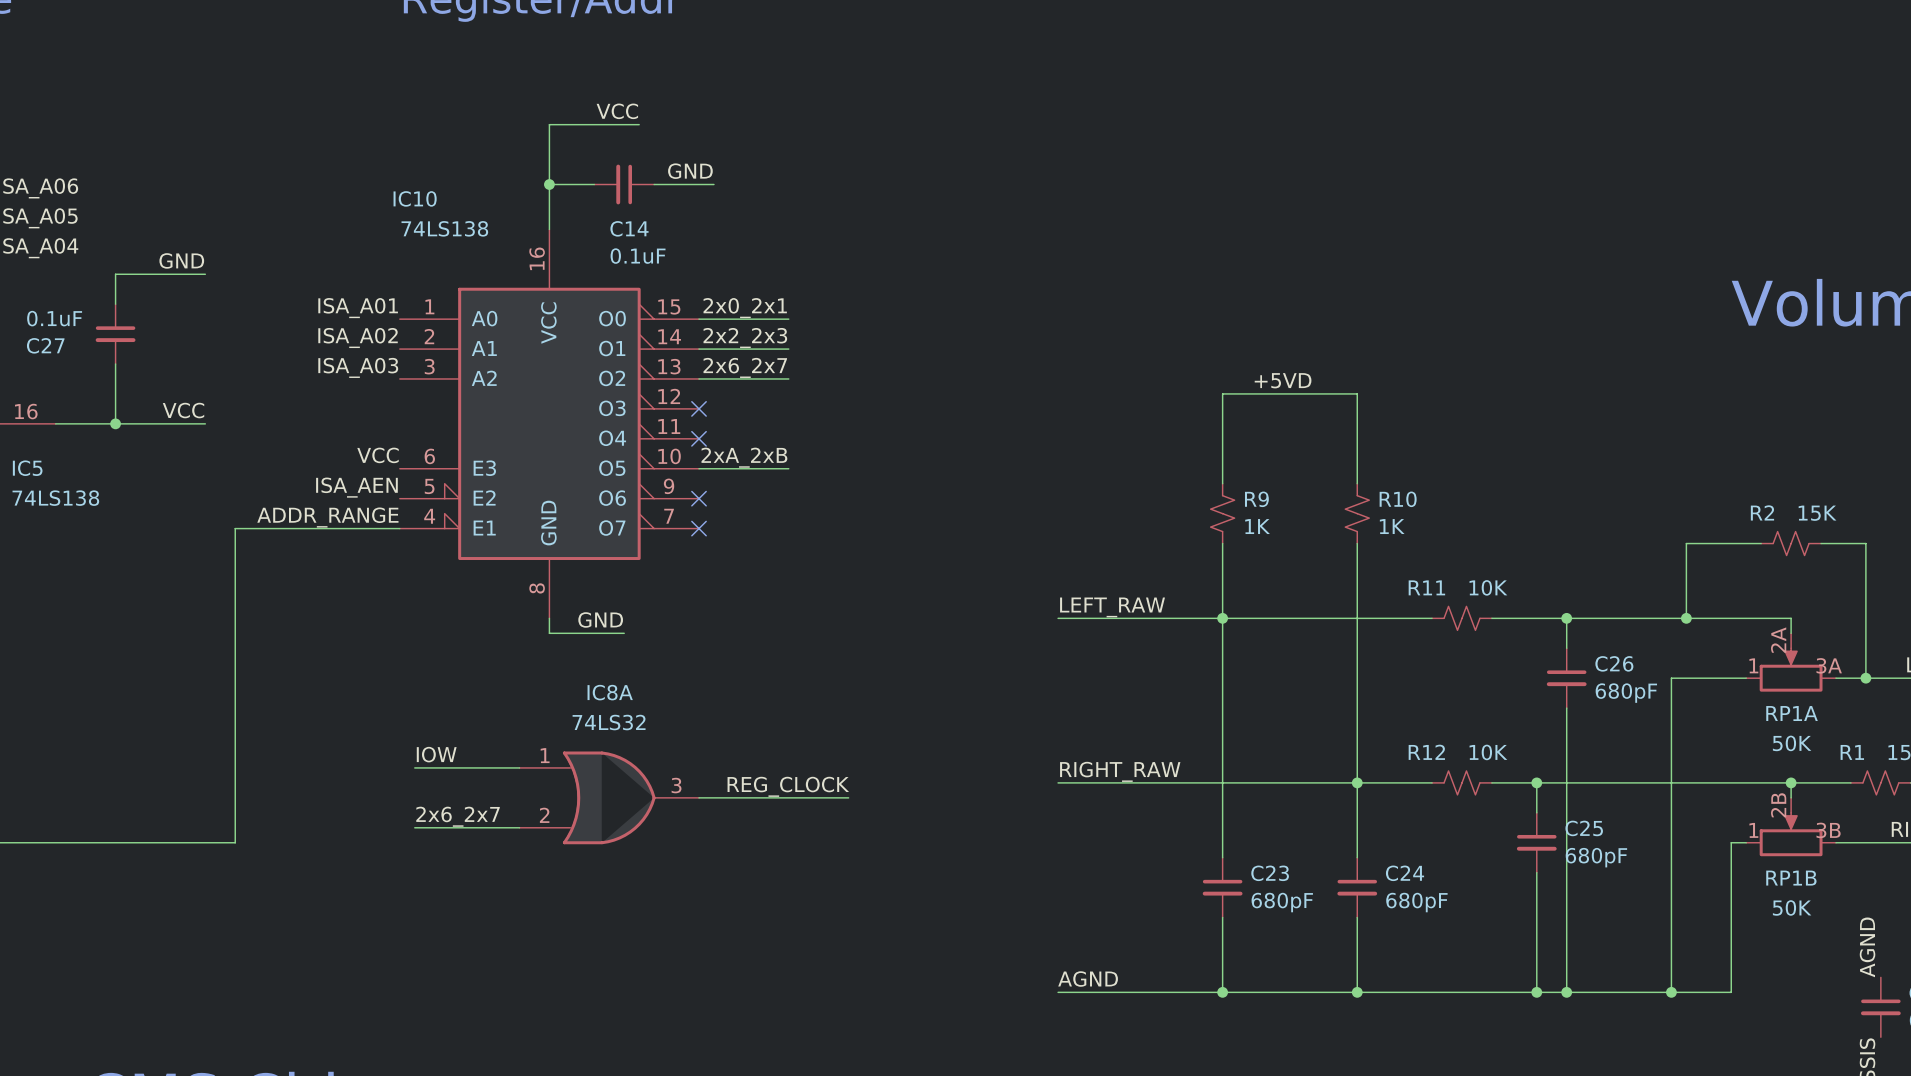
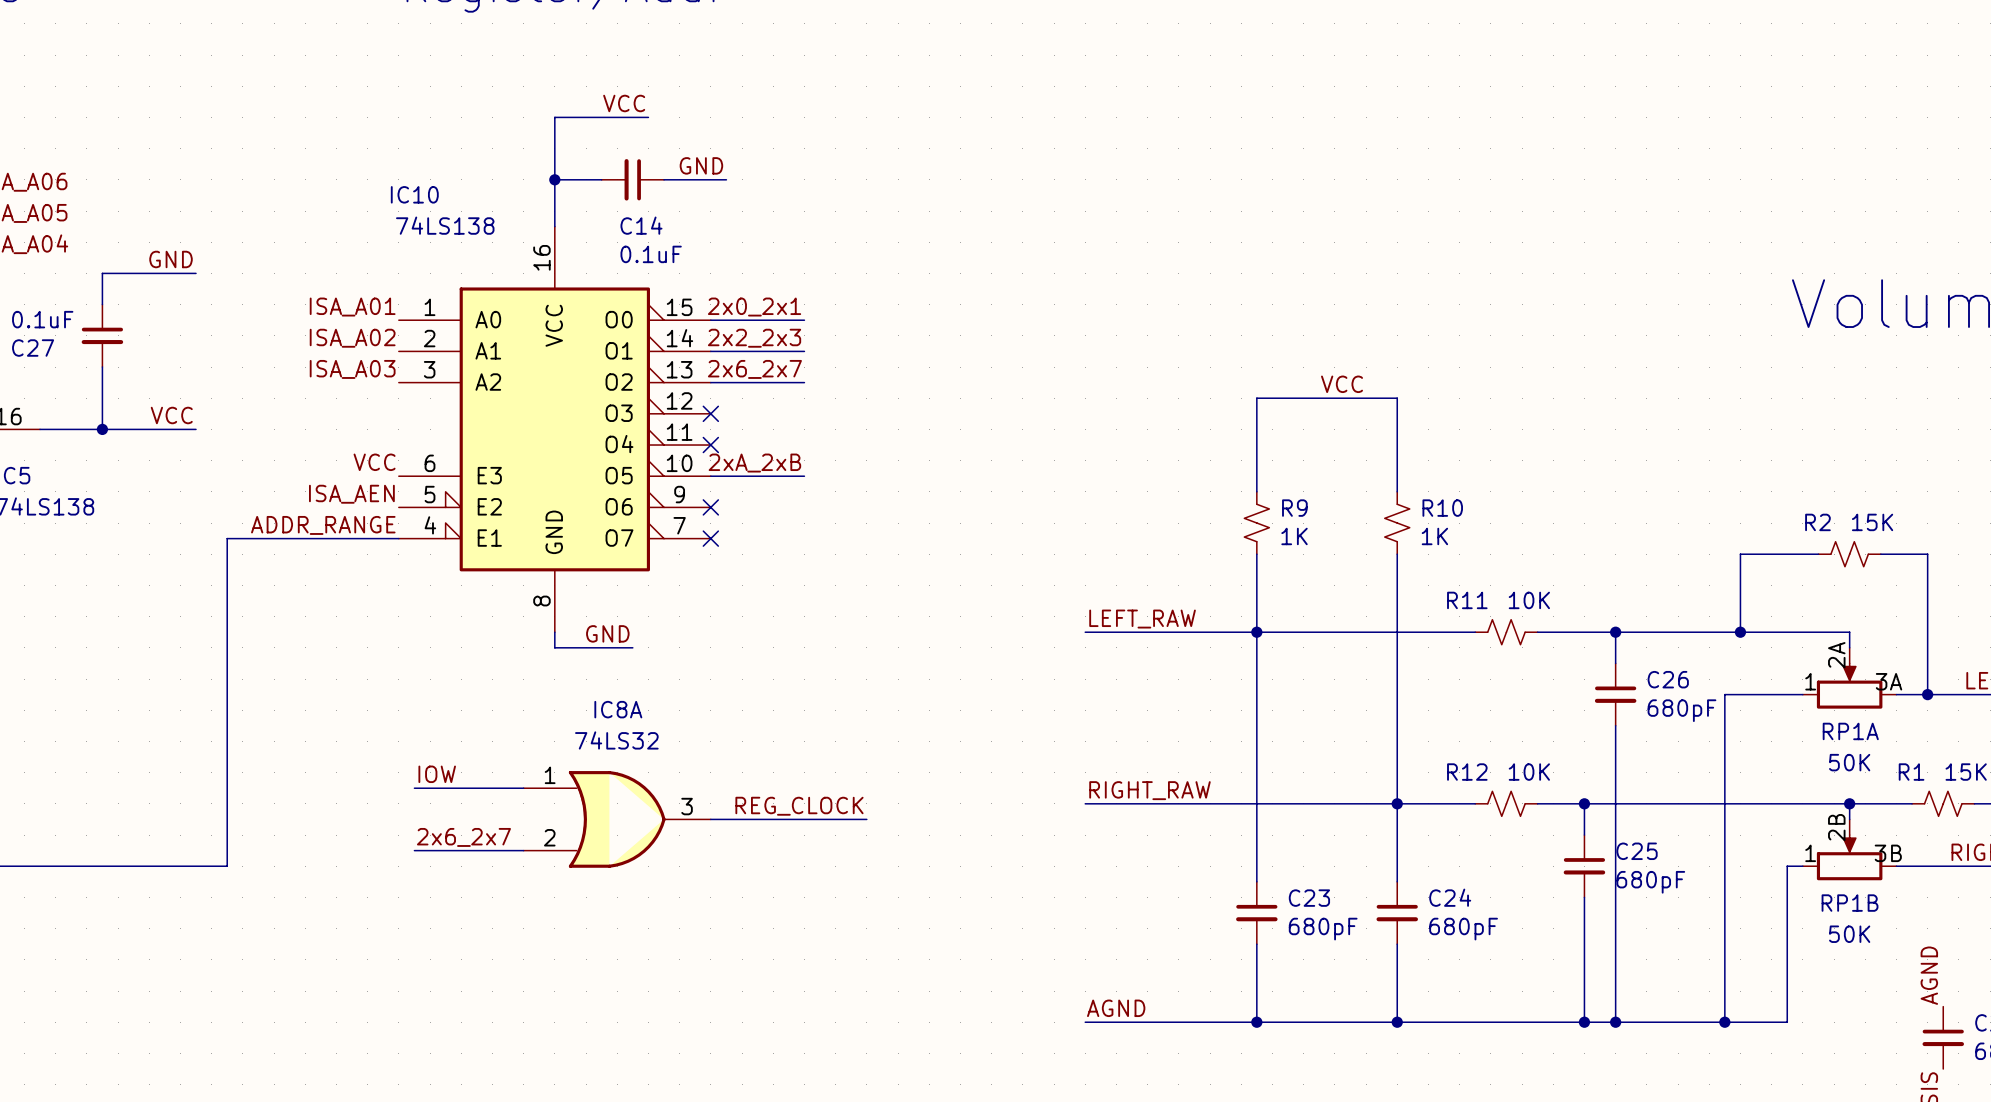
label: +5VD (1283, 380) -> none
label: none -> VCC (1342, 384)

